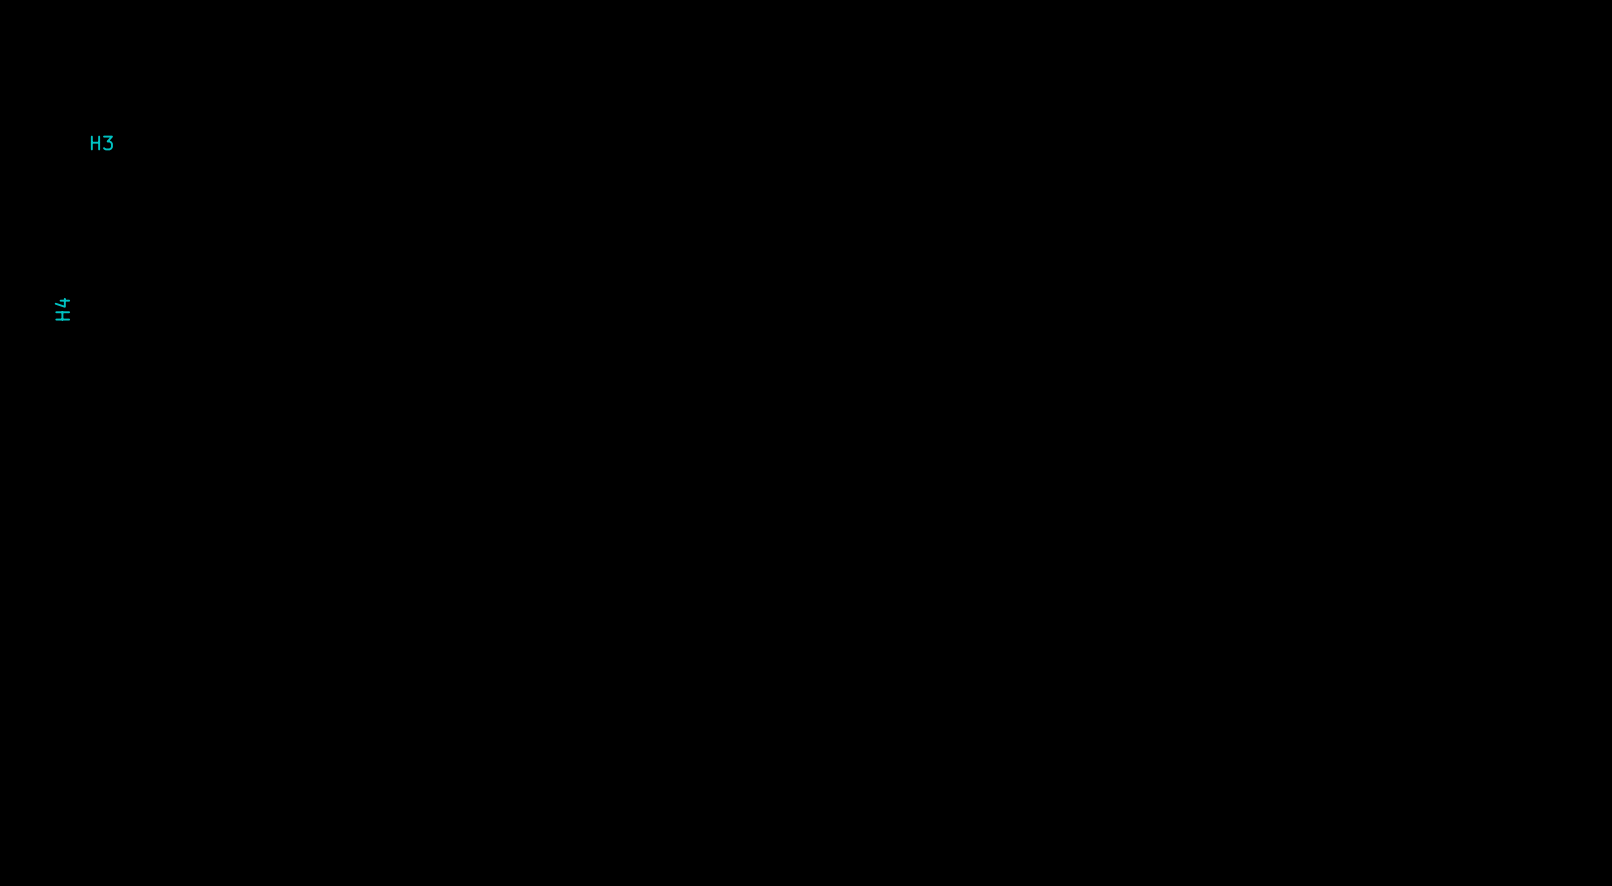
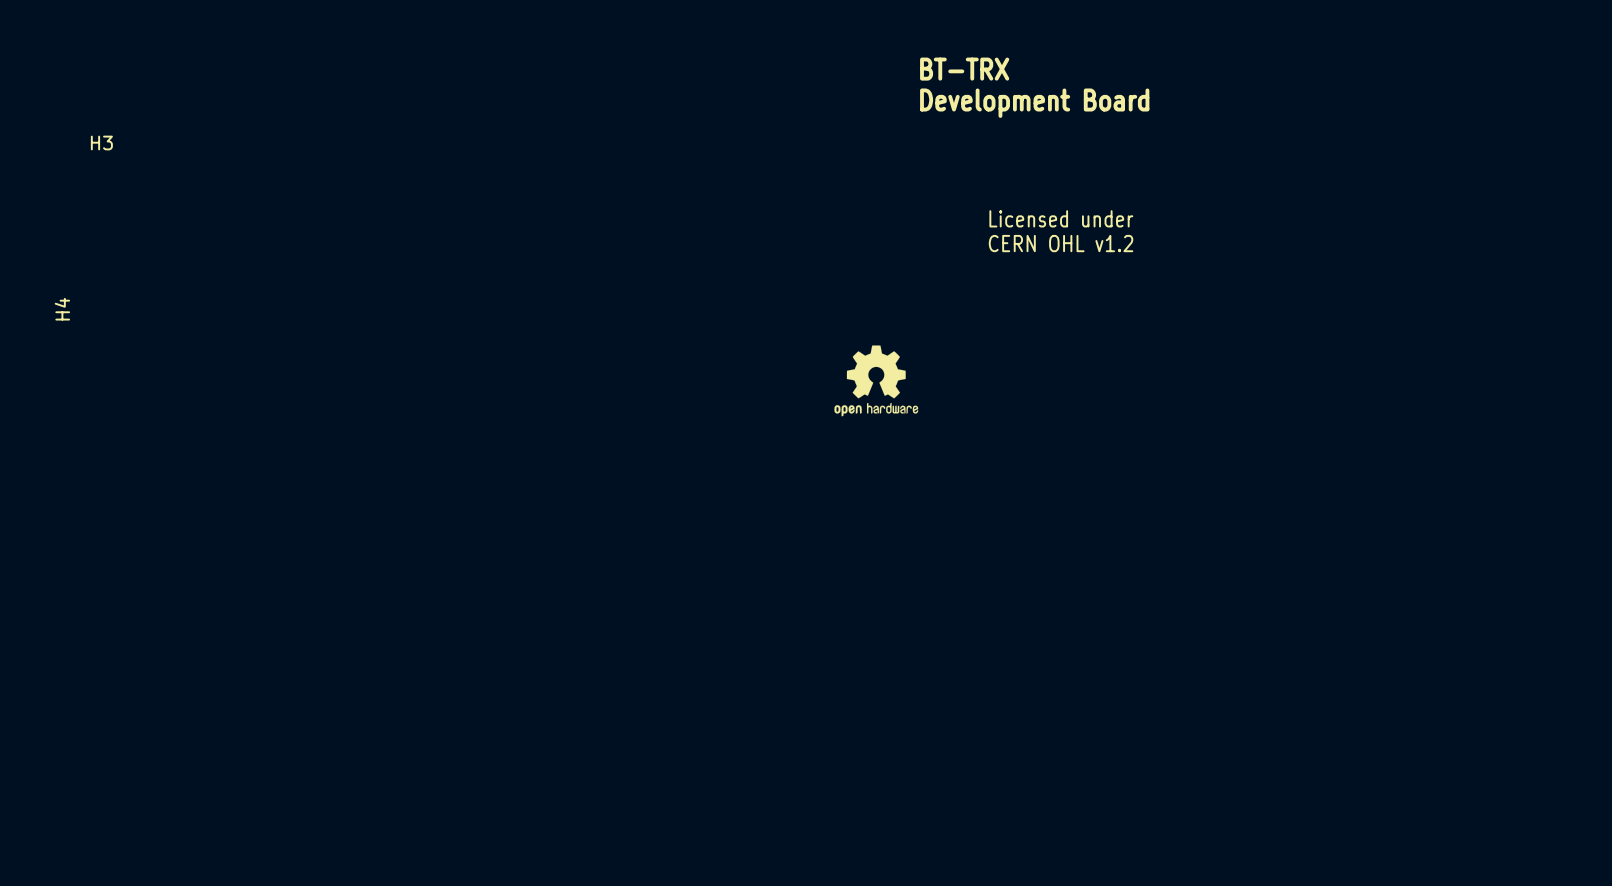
text: none -> BT-TRX (964, 69)
text: none -> Development Board (1034, 103)
text: none -> Licensed under (1061, 218)
text: none -> CERN OHL v1.2 (1061, 243)
drawing: none -> [834, 345, 919, 417]

